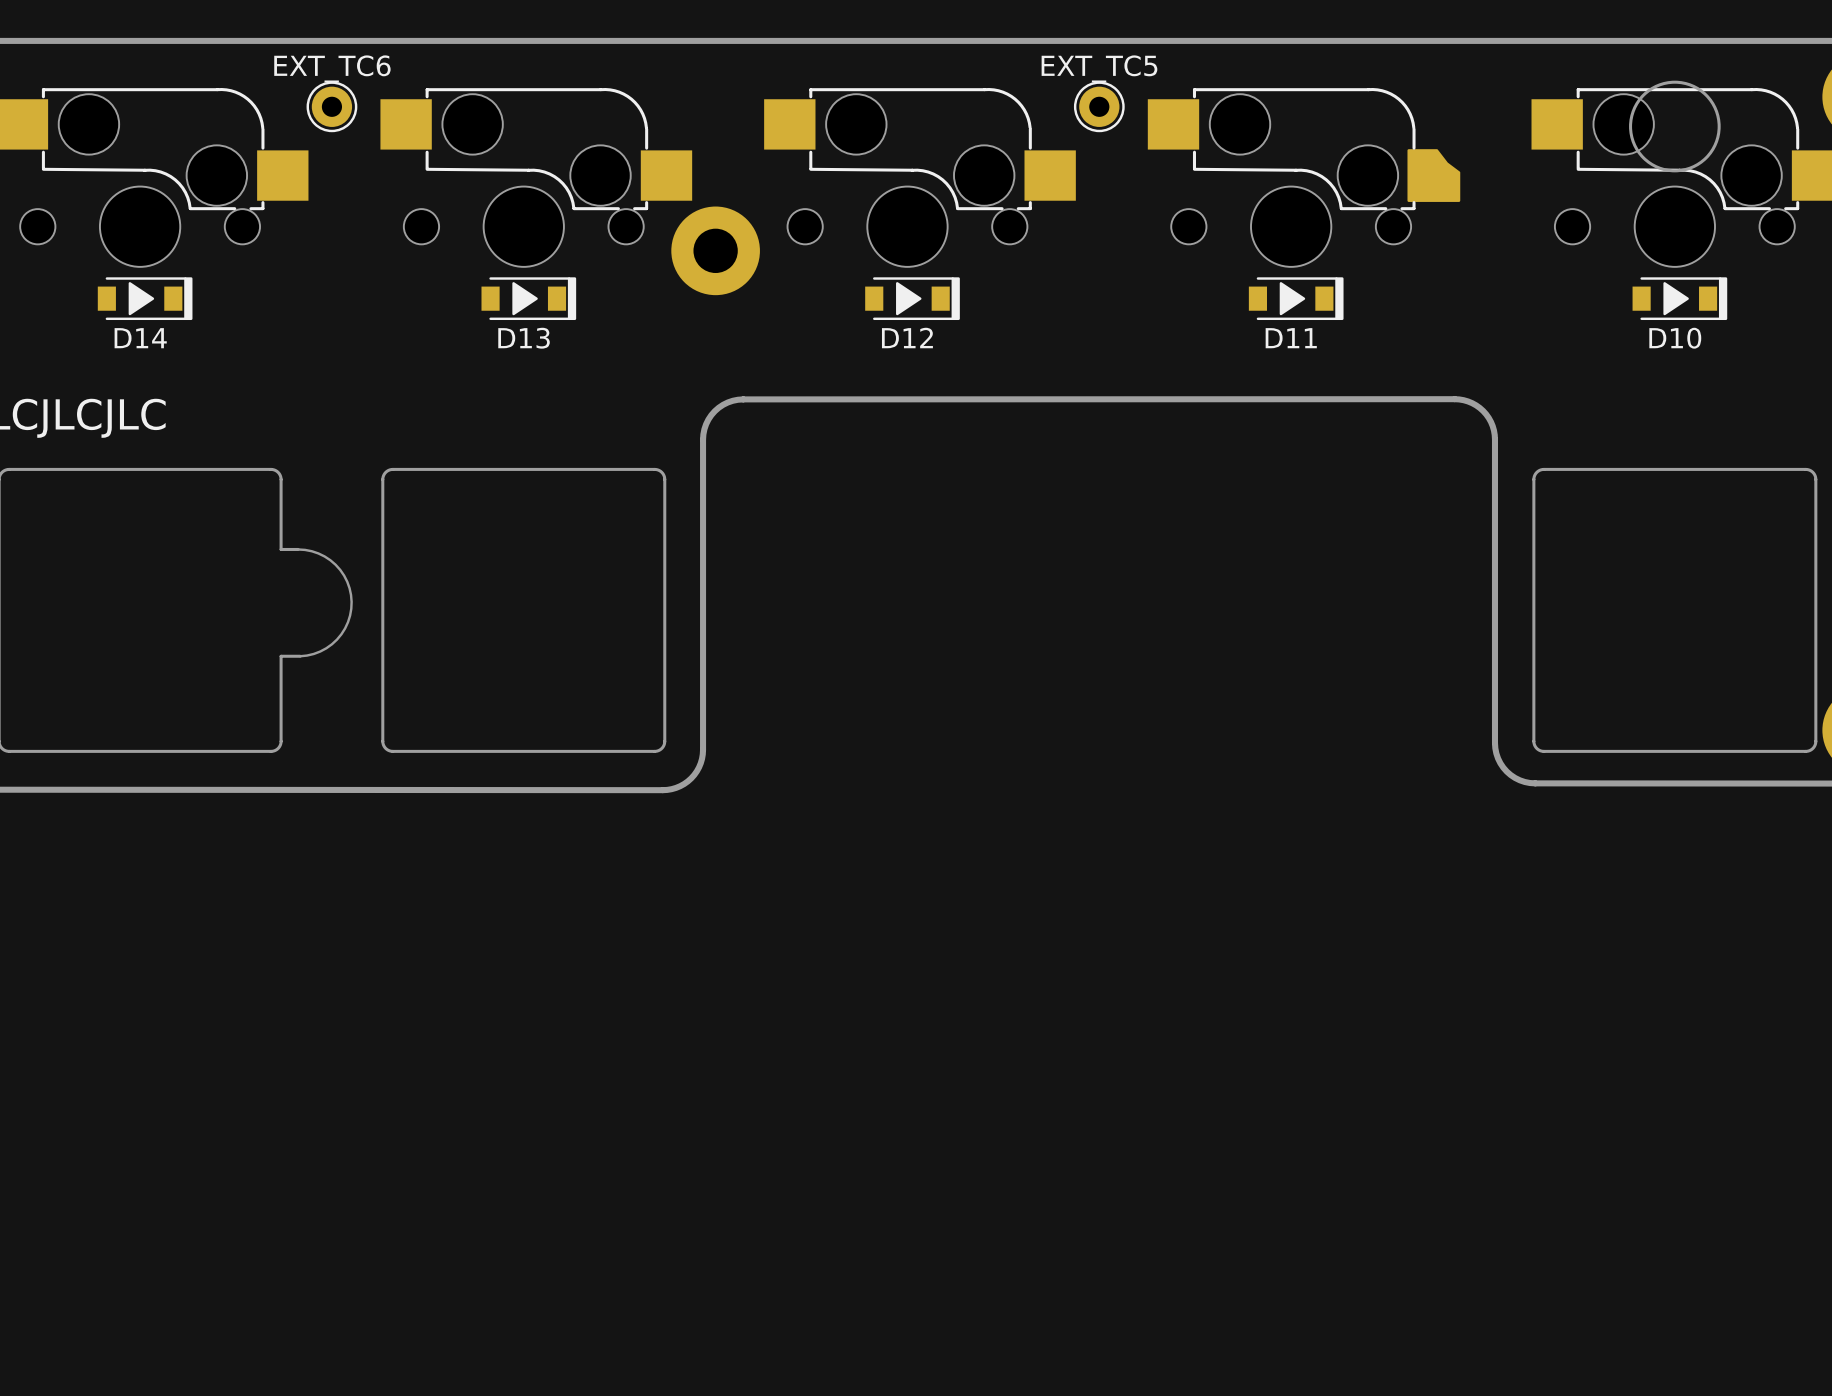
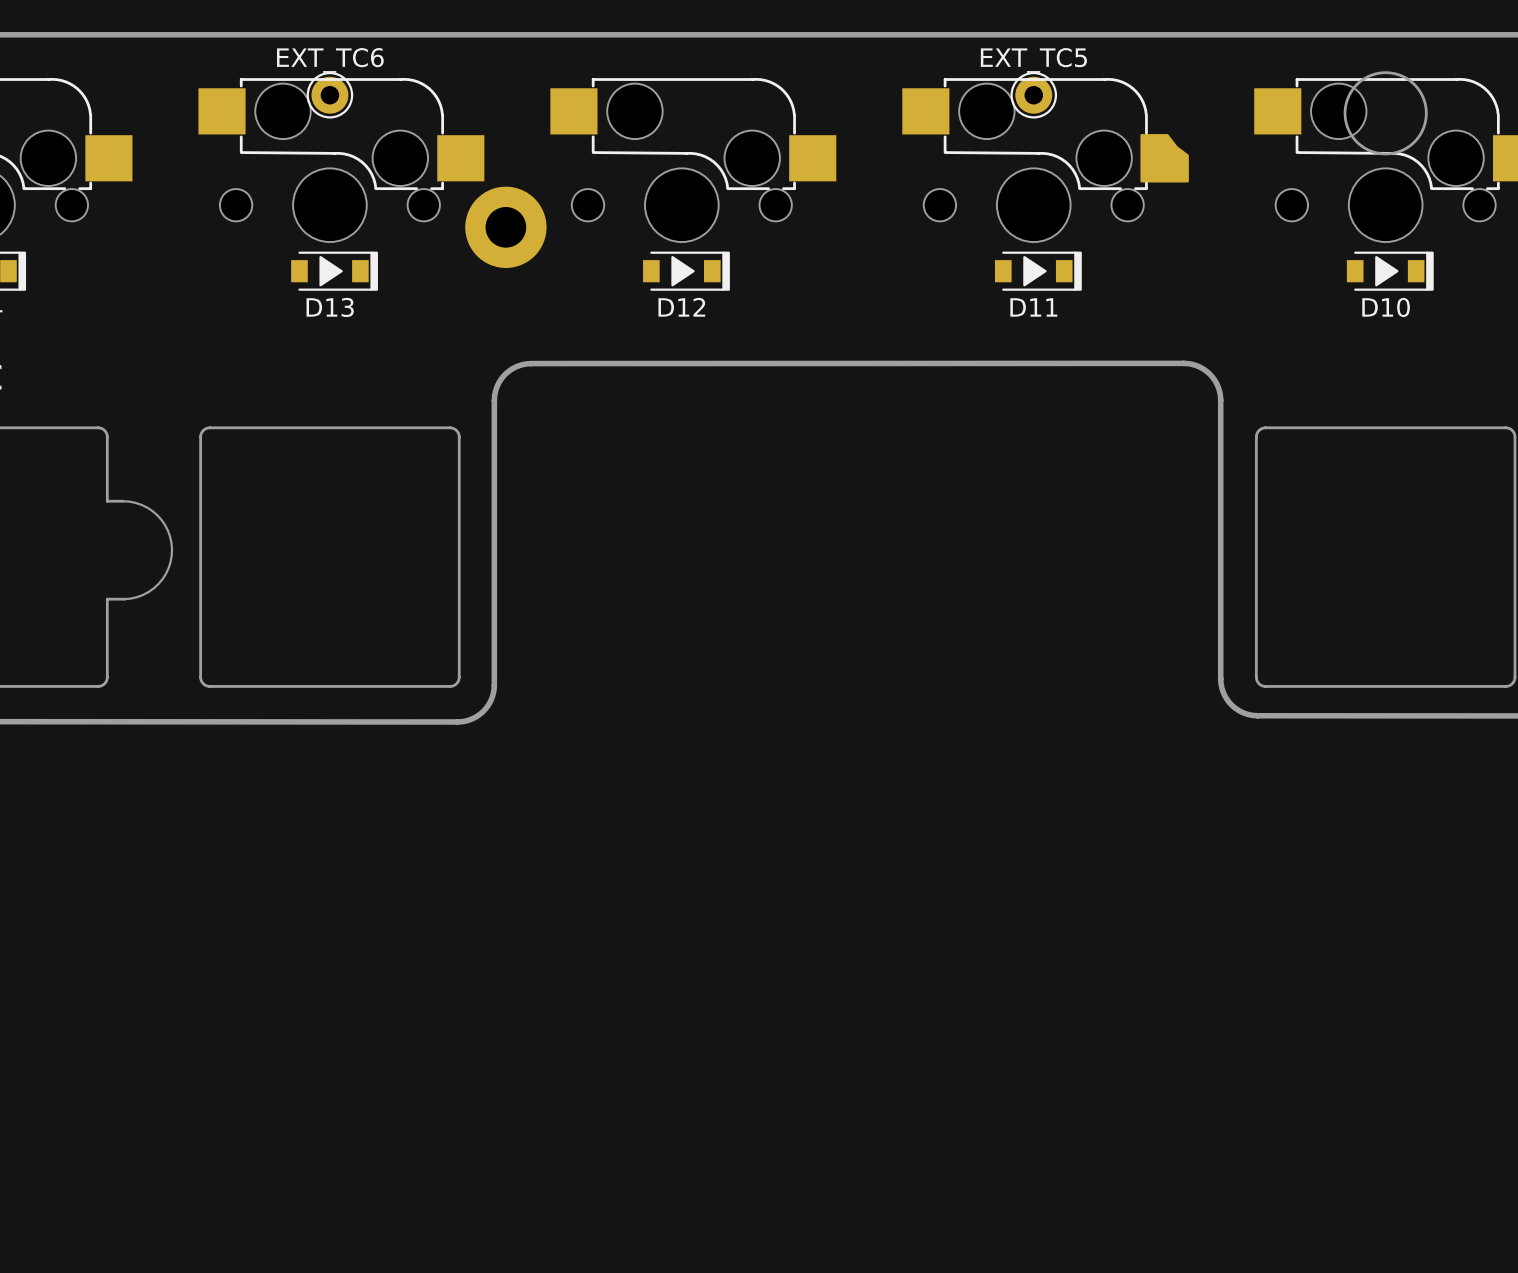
EXT_TC6 position: (331, 106) -> (329, 95)
EXT_TC5 position: (1099, 106) -> (1033, 95)

